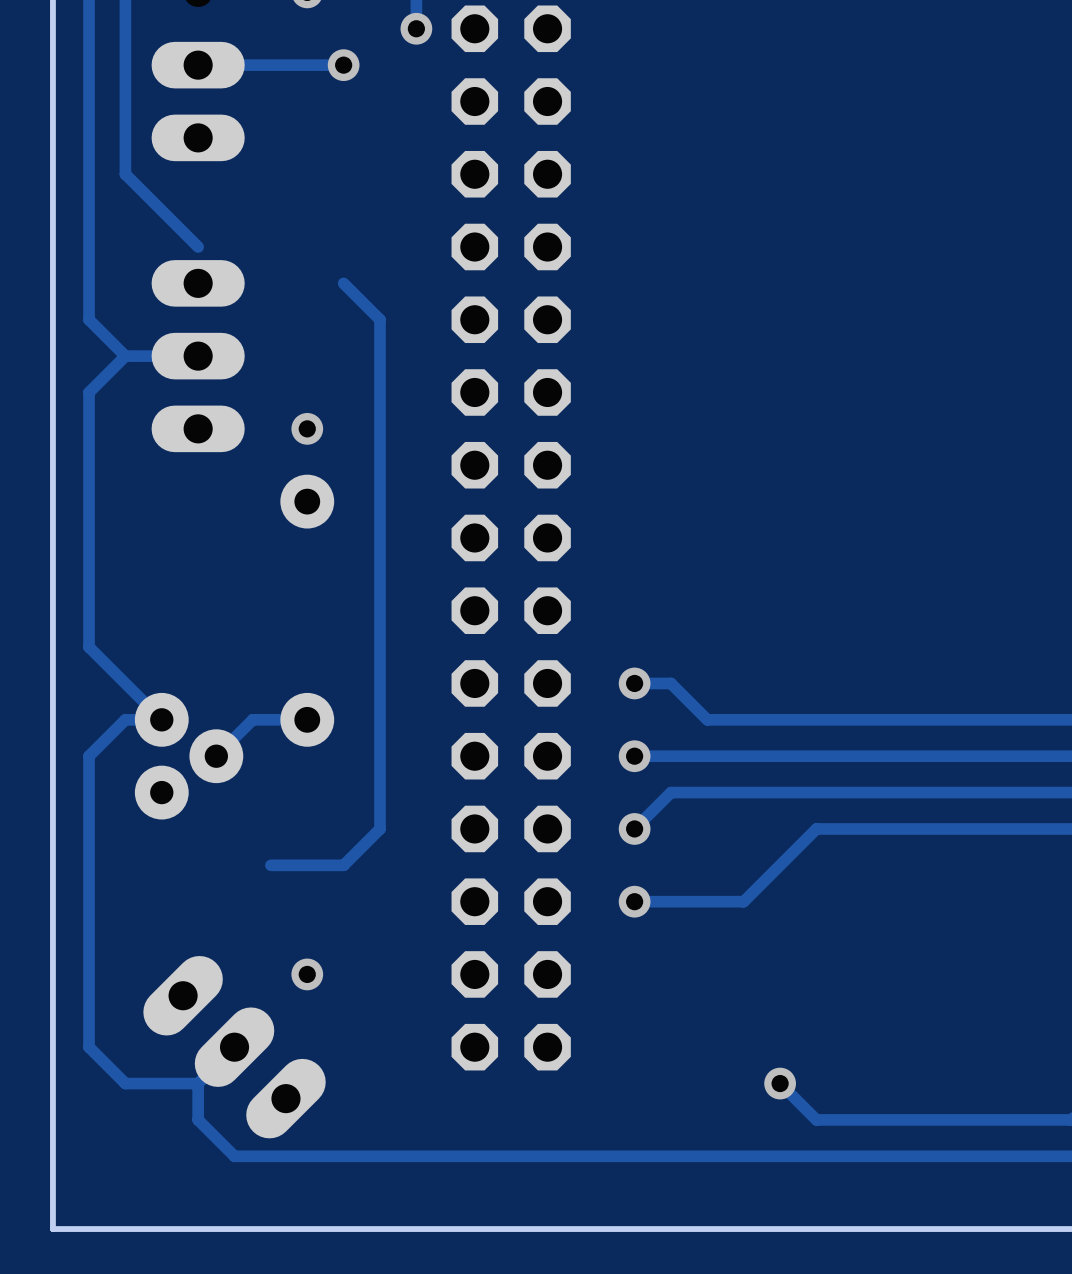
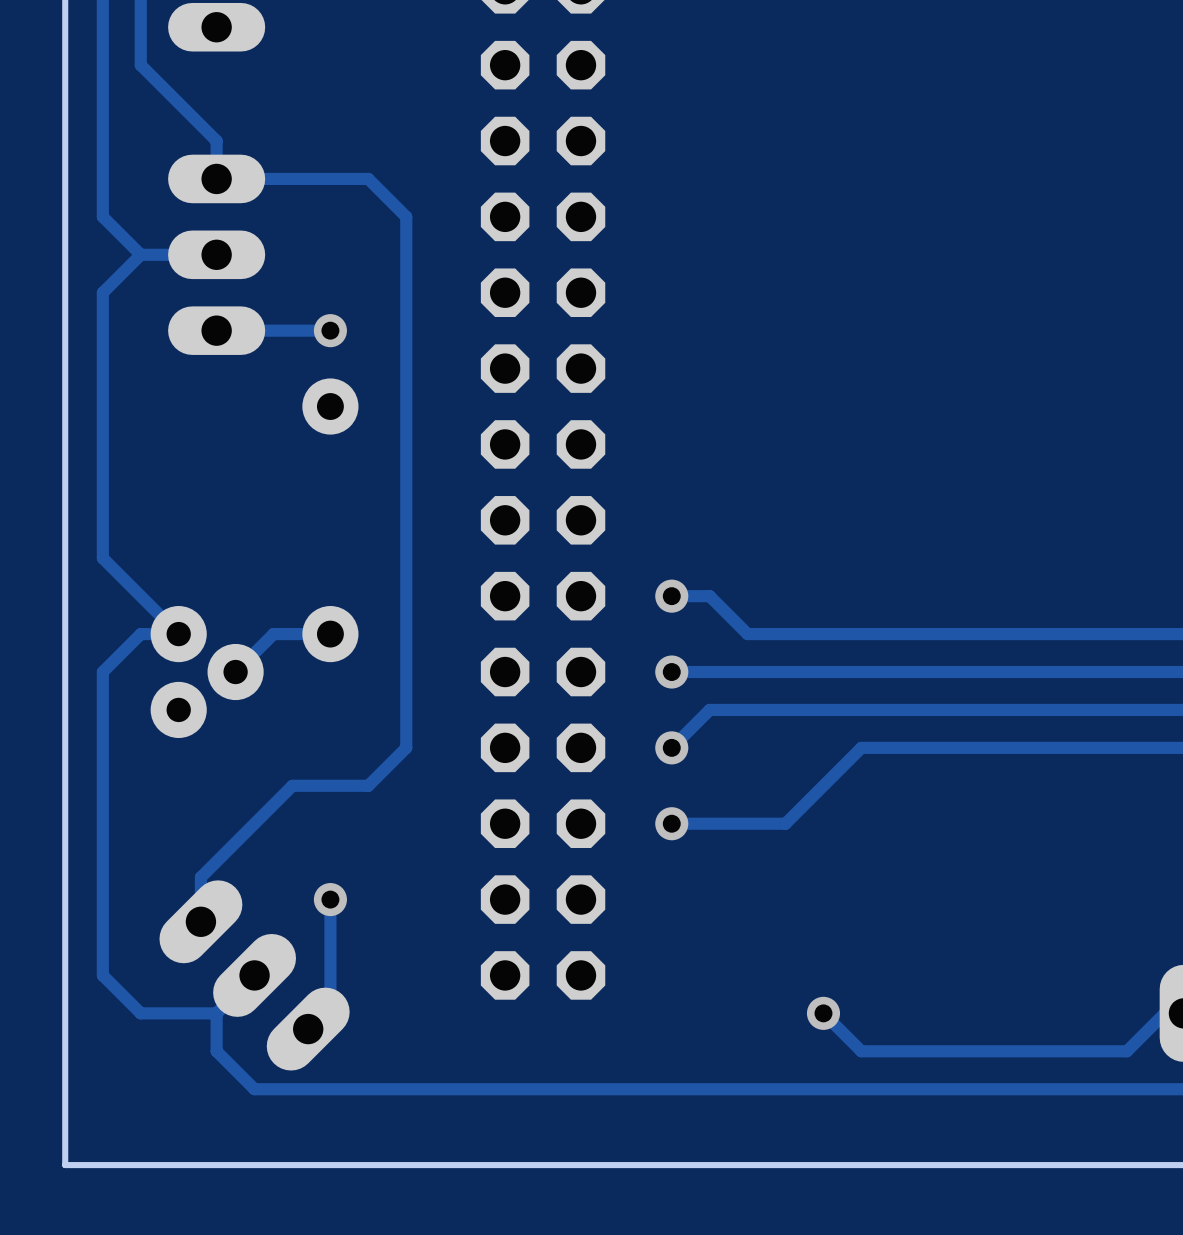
track: none -> (216, 141) (216, 178) (368, 178)
track: none -> (330, 330) (216, 330)
track: none -> (292, 785) (200, 877) (200, 921)
track: none -> (330, 899) (330, 1013)

